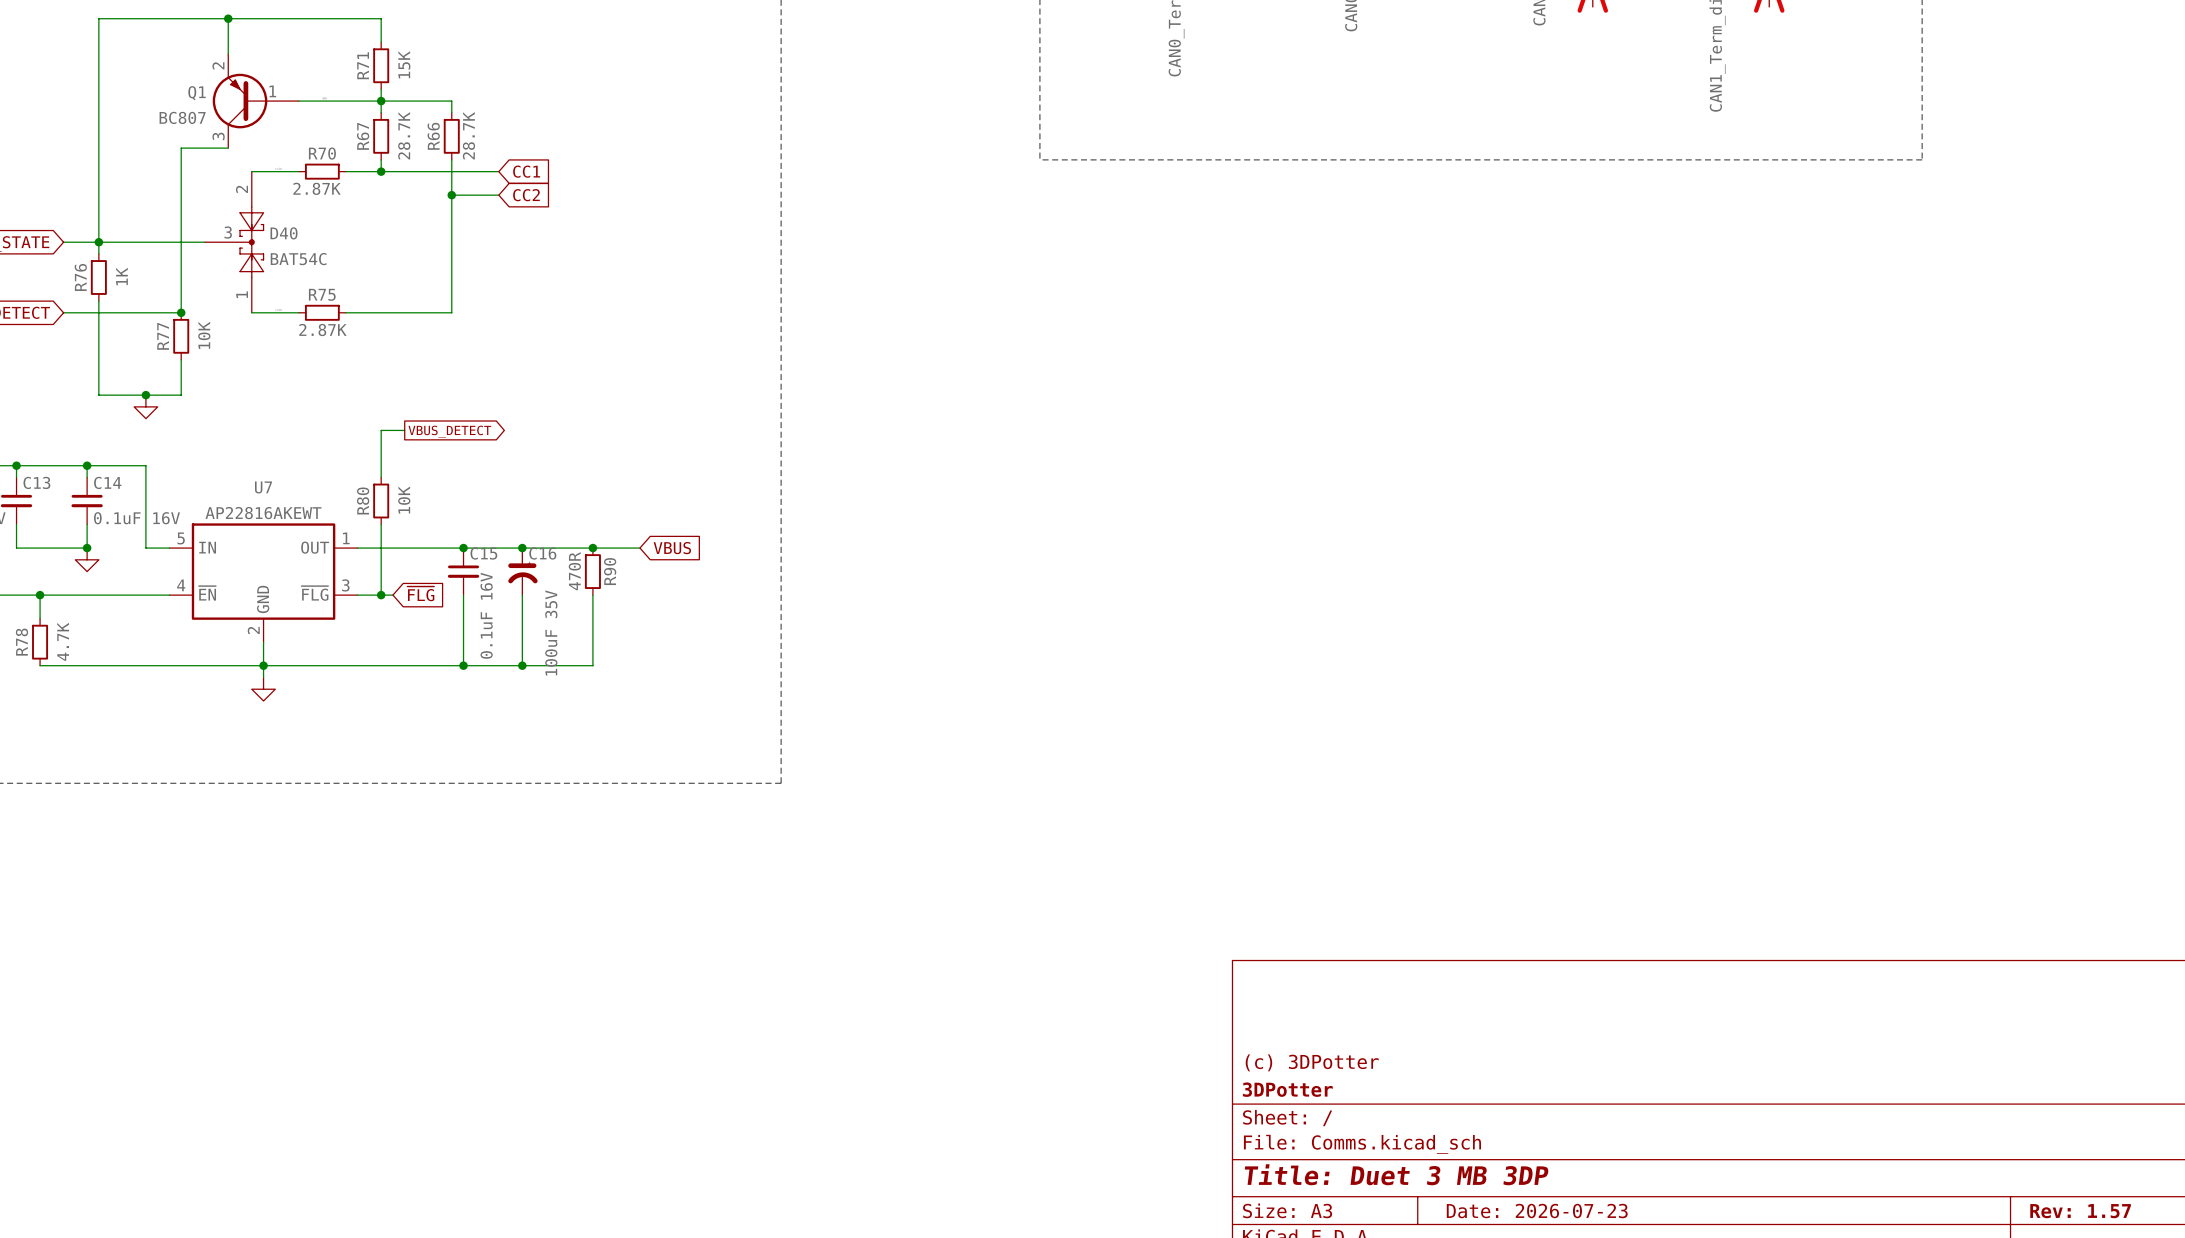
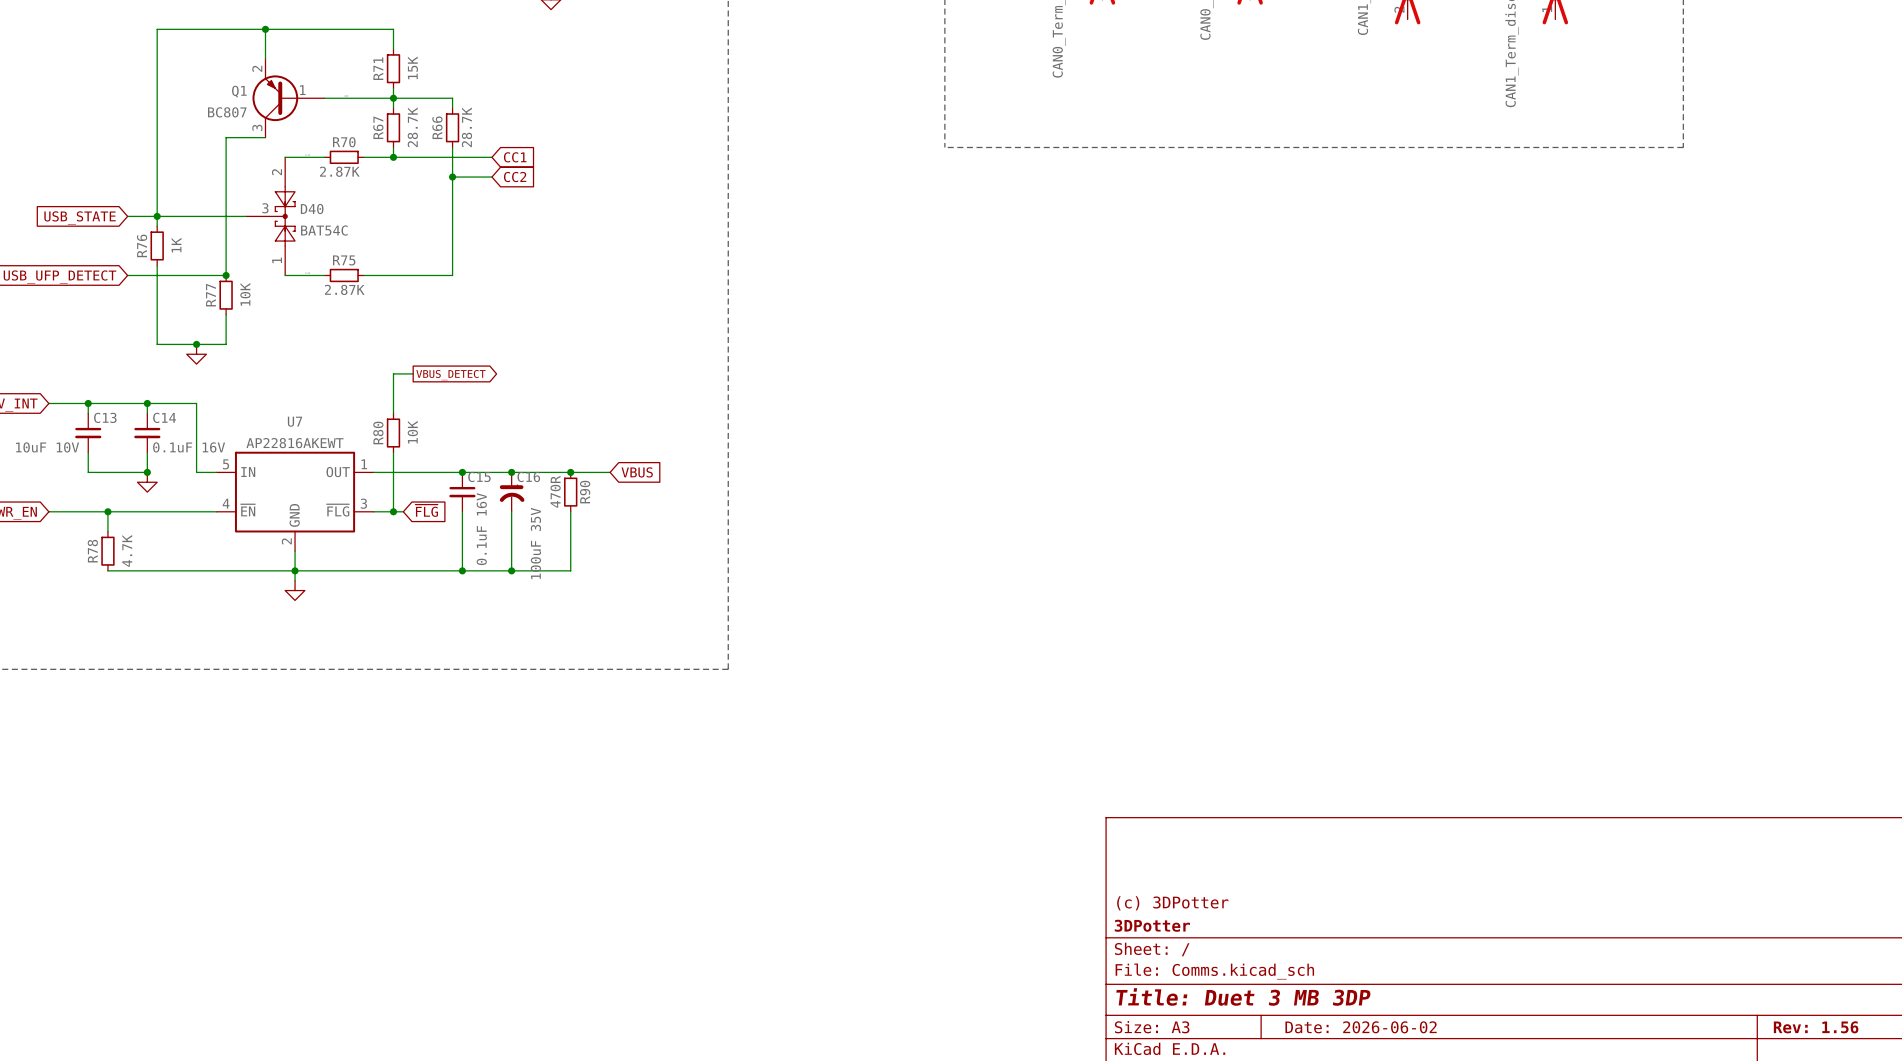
title block: Date: 2026-07-23 (1537, 1211) -> Date: 2026-06-02 (1361, 1027)
title block: Rev: 1.57 (2080, 1211) -> Rev: 1.56 (1816, 1027)

